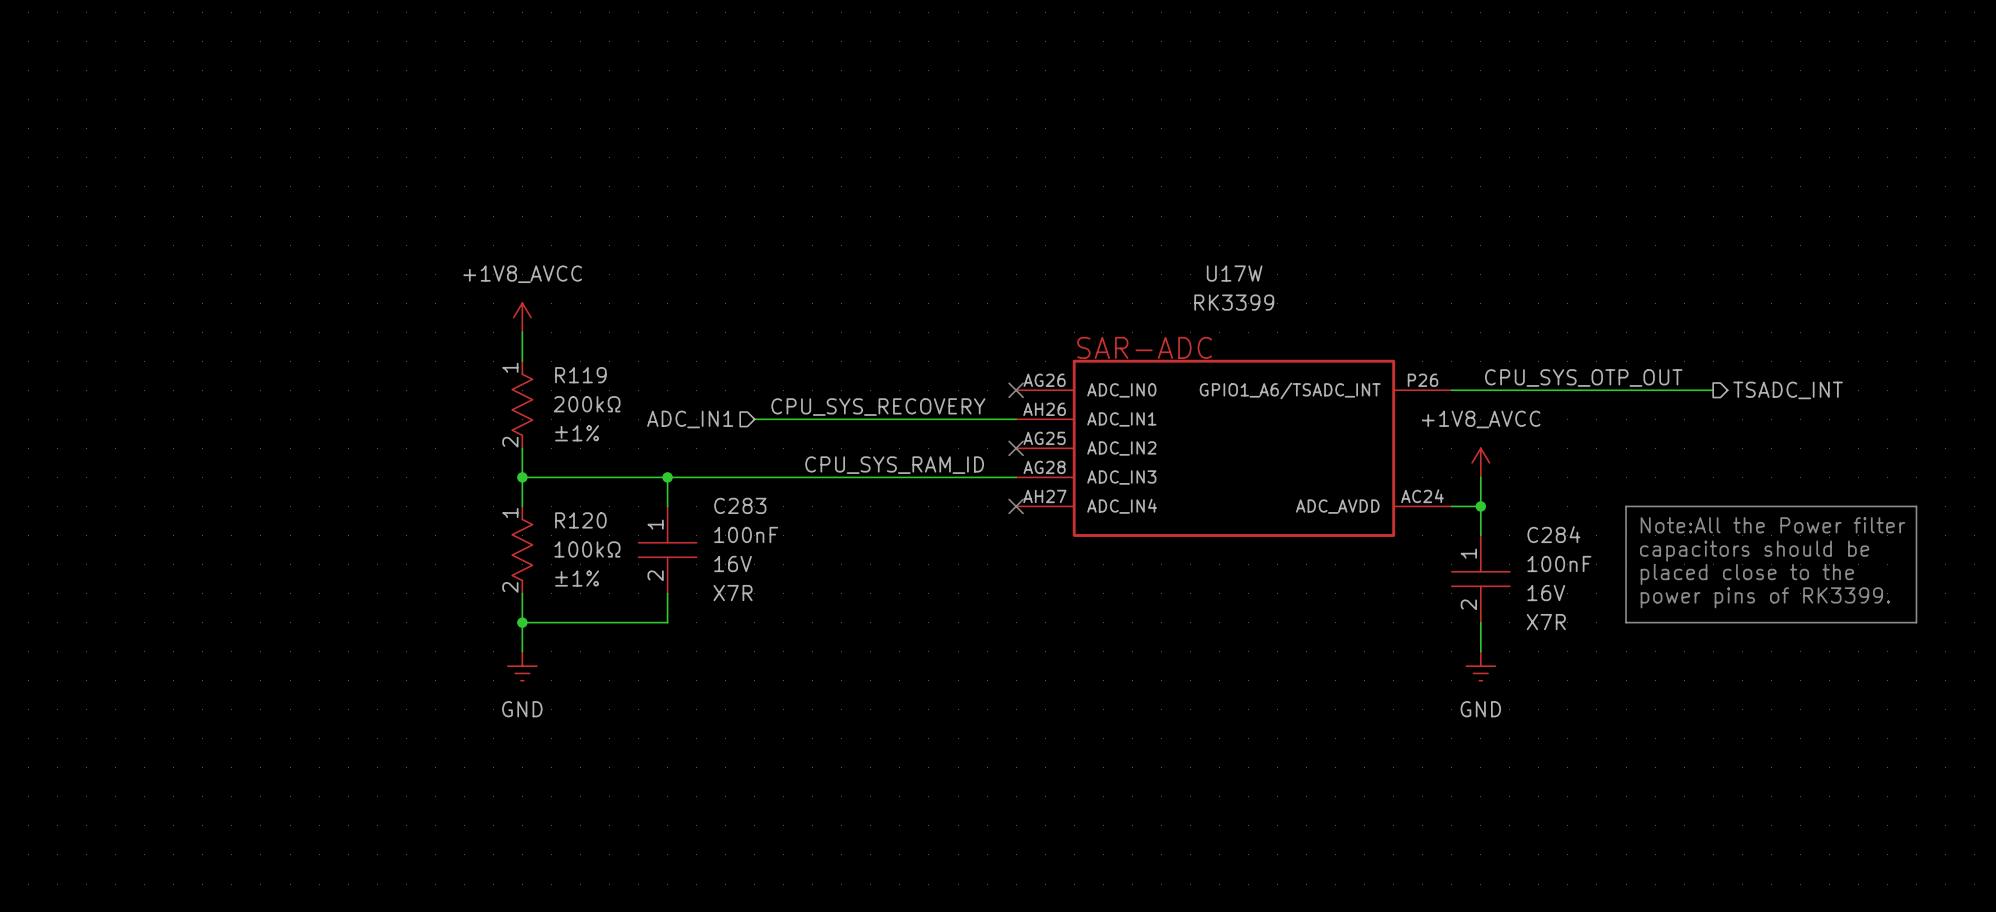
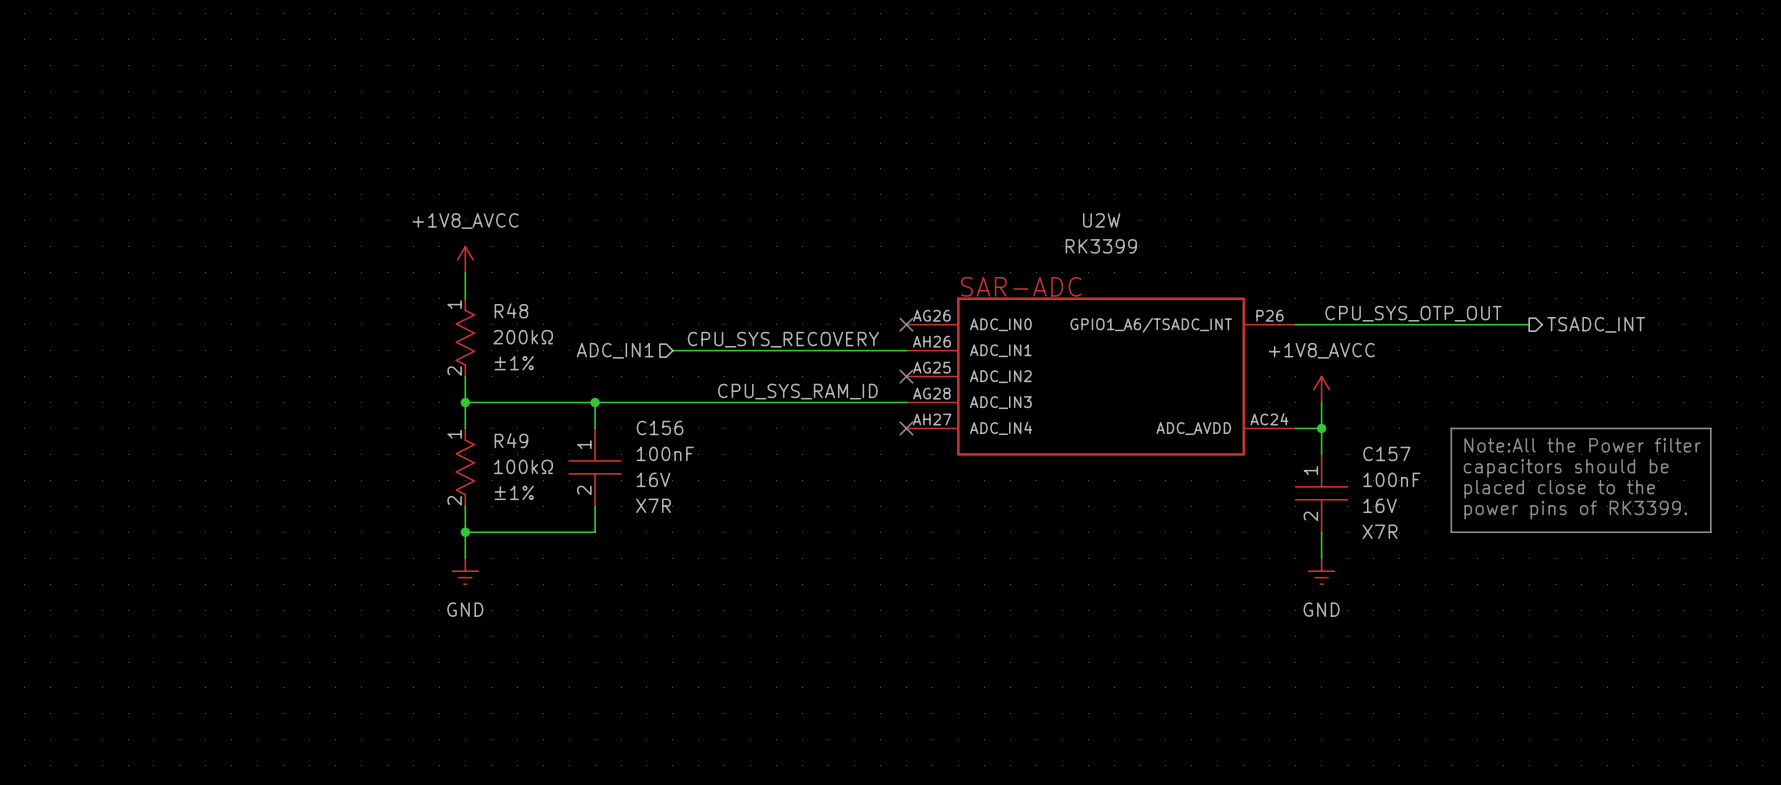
U17W name: U17W (1234, 273) -> U2W (1101, 220)
R119 name: R119 (580, 375) -> R48 (511, 310)
C283 name: C283 (740, 505) -> C156 (660, 427)
R120 name: R120 (580, 520) -> R49 (511, 440)
C284 name: C284 (1553, 534) -> C157 (1386, 453)

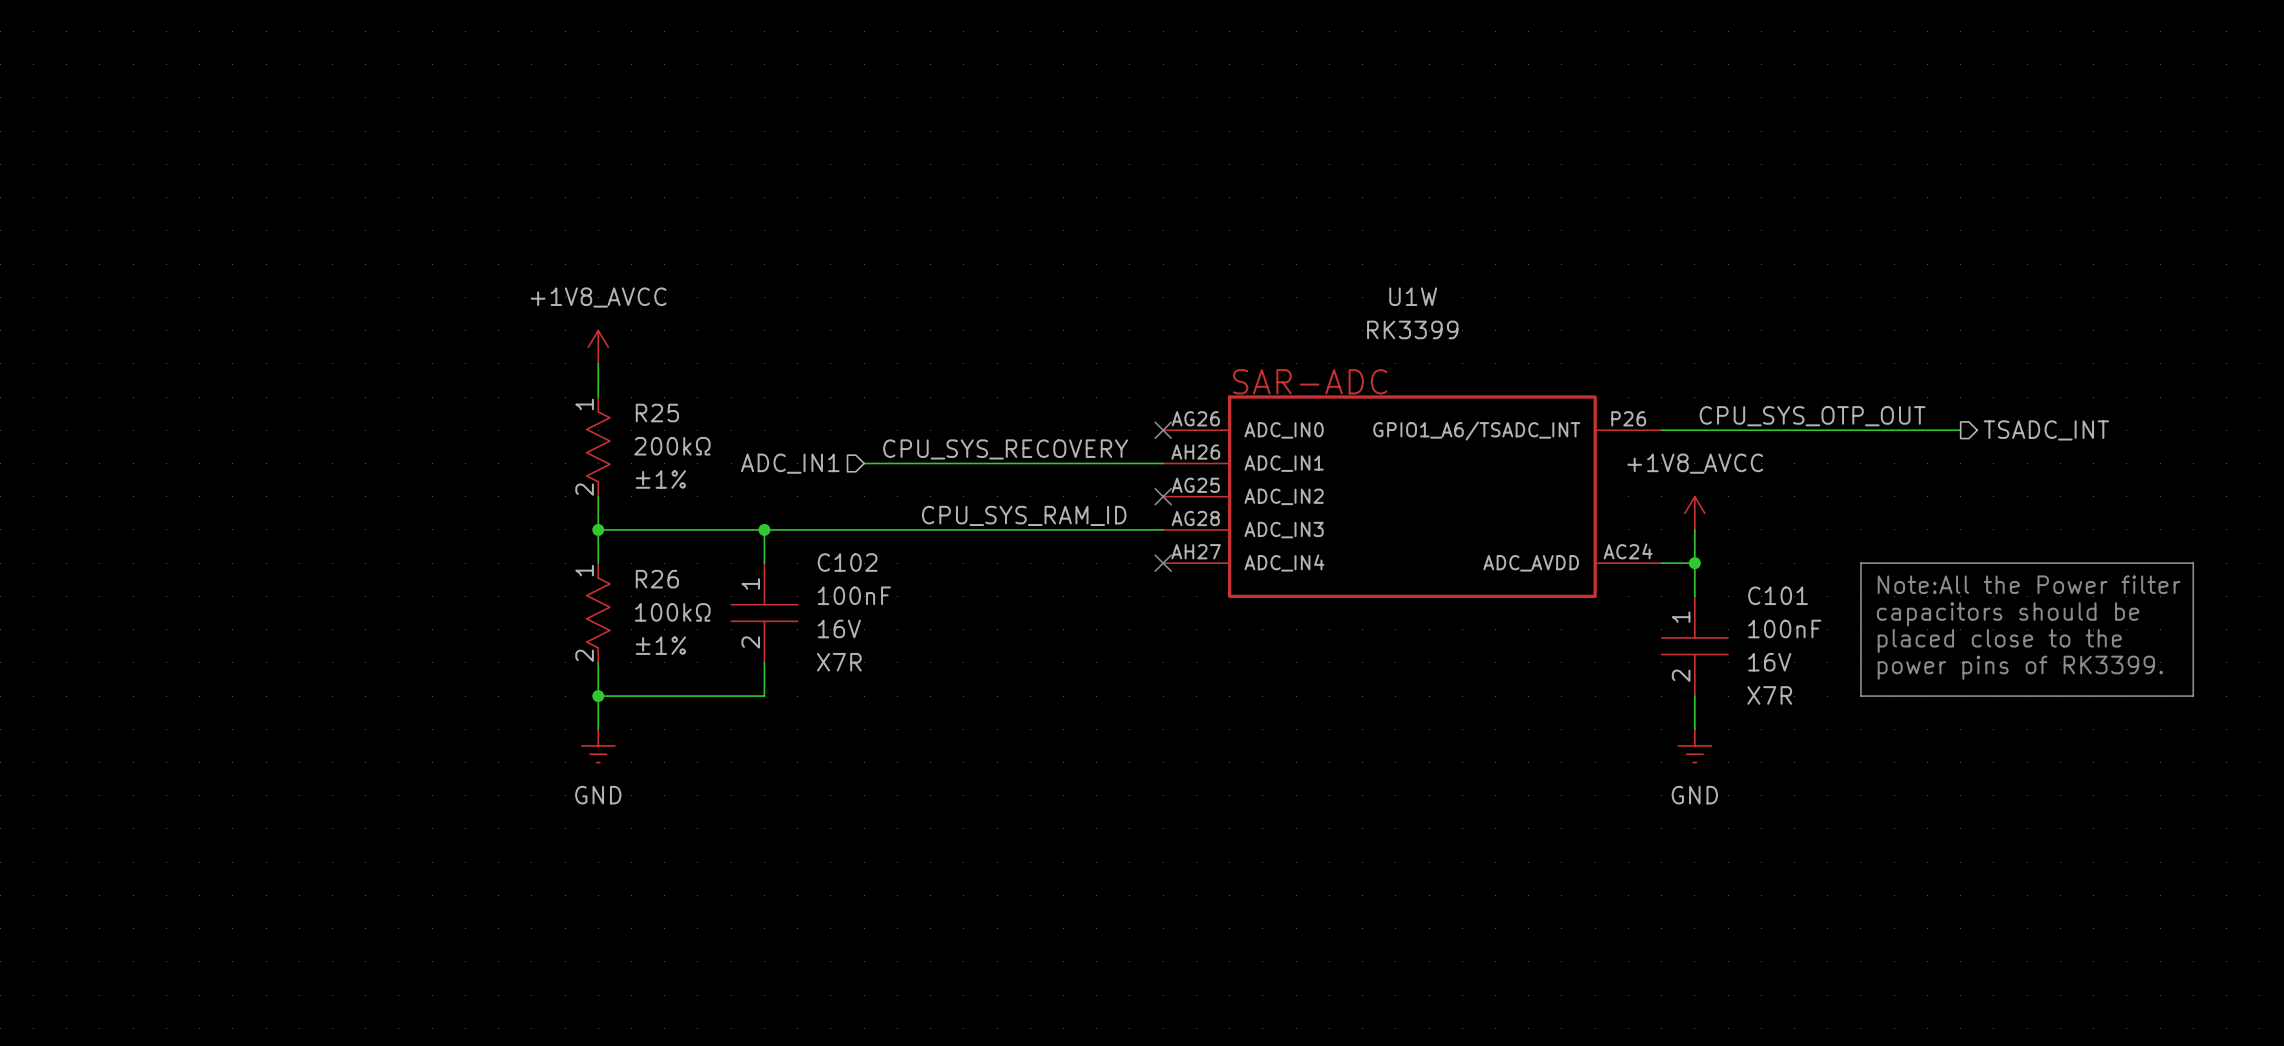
U2W name: U2W (1101, 220) -> U1W (1413, 296)
R48 name: R48 (511, 310) -> R25 (657, 413)
C156 name: C156 (660, 427) -> C102 (847, 562)
R49 name: R49 (511, 440) -> R26 (657, 579)
C157 name: C157 (1386, 453) -> C101 (1778, 595)

